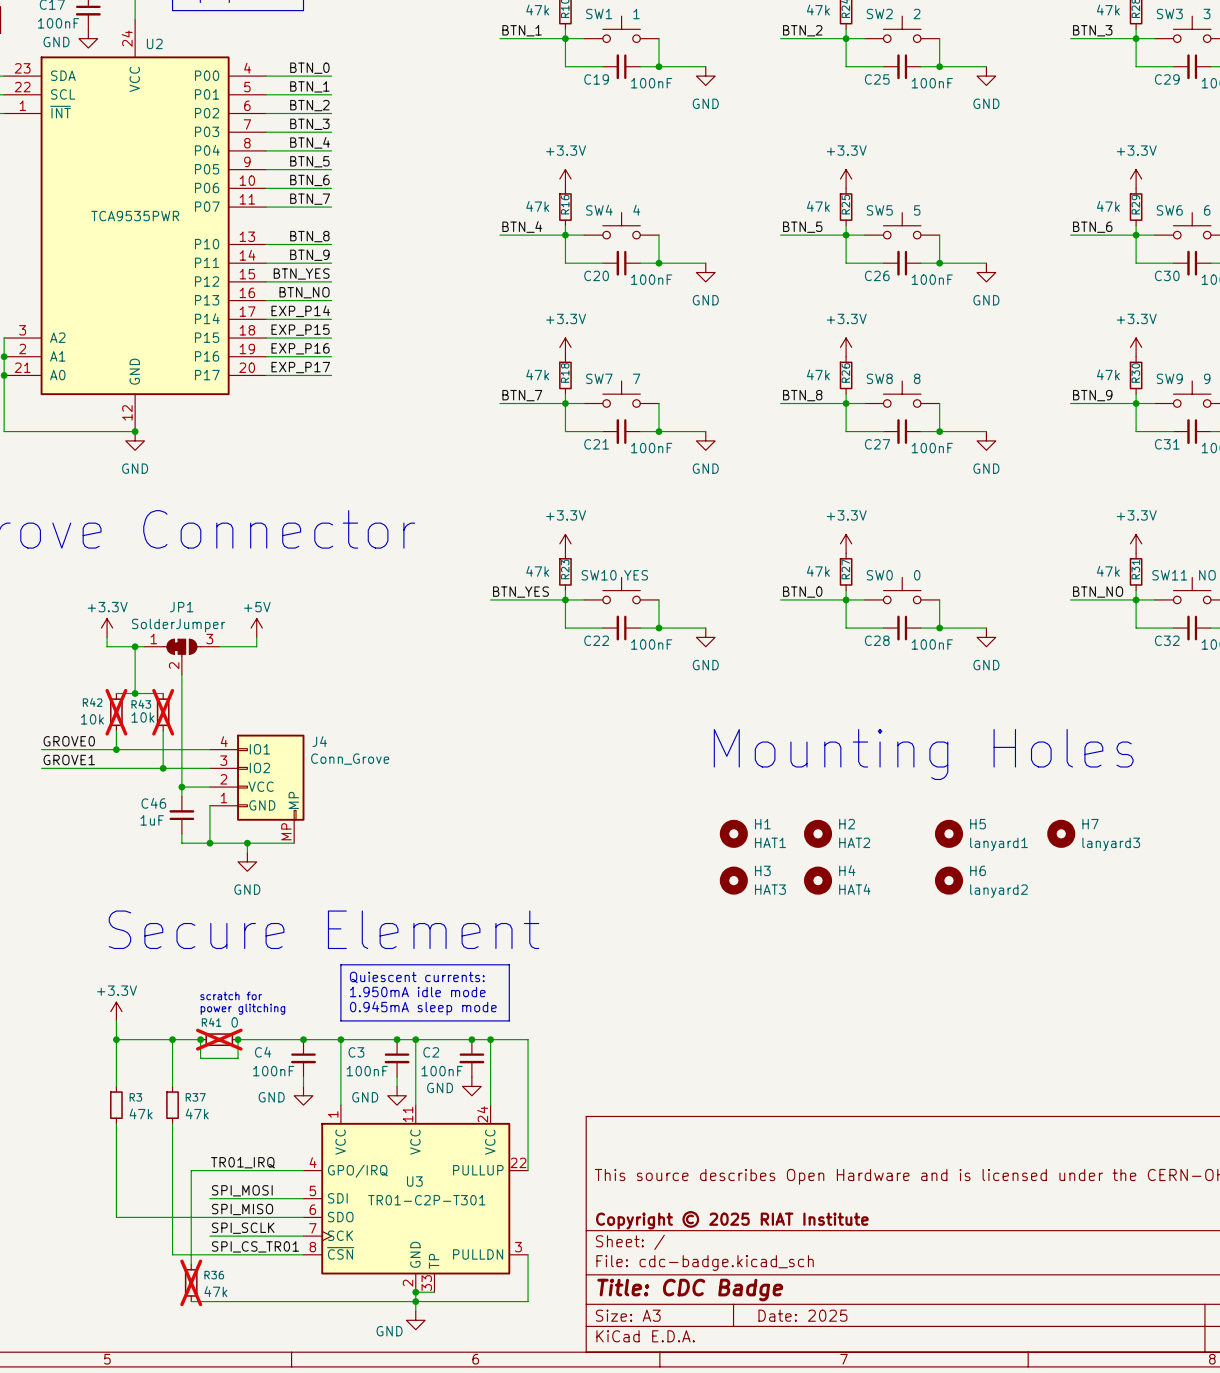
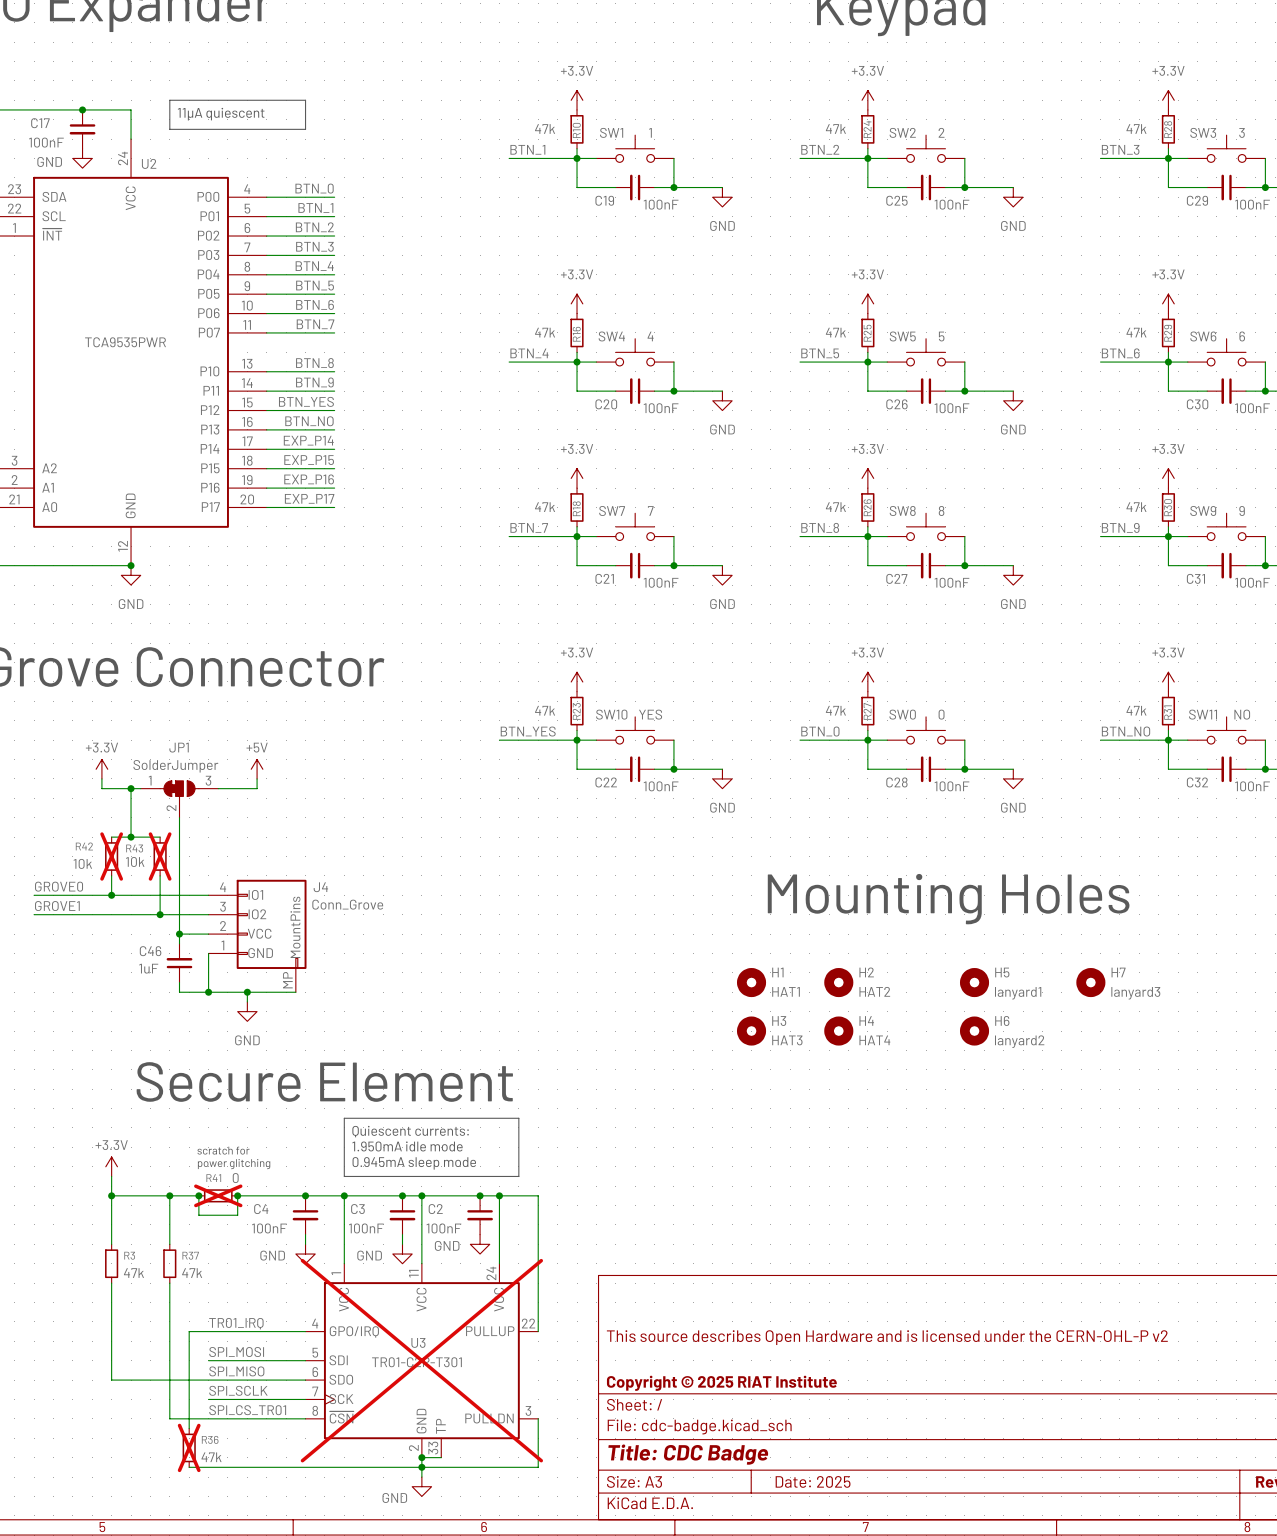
J4 pin name: MP (293, 800) -> MountPins (295, 927)
U3 do-not-place cross: none -> (421, 1360)

